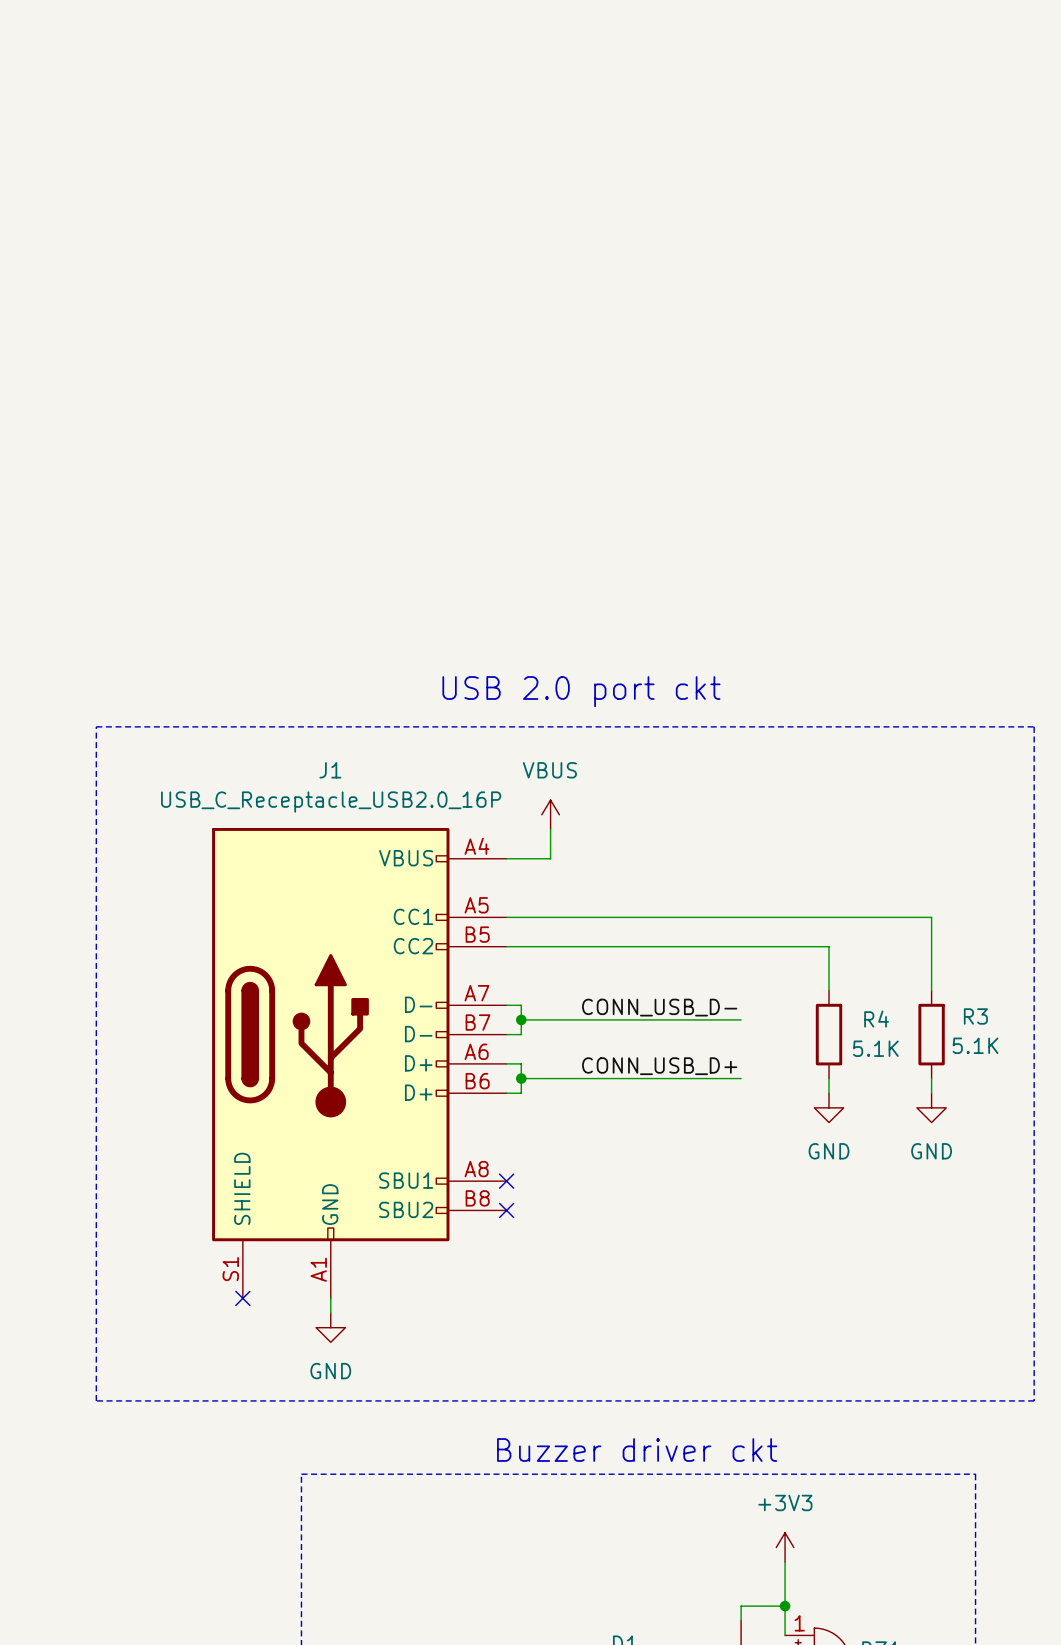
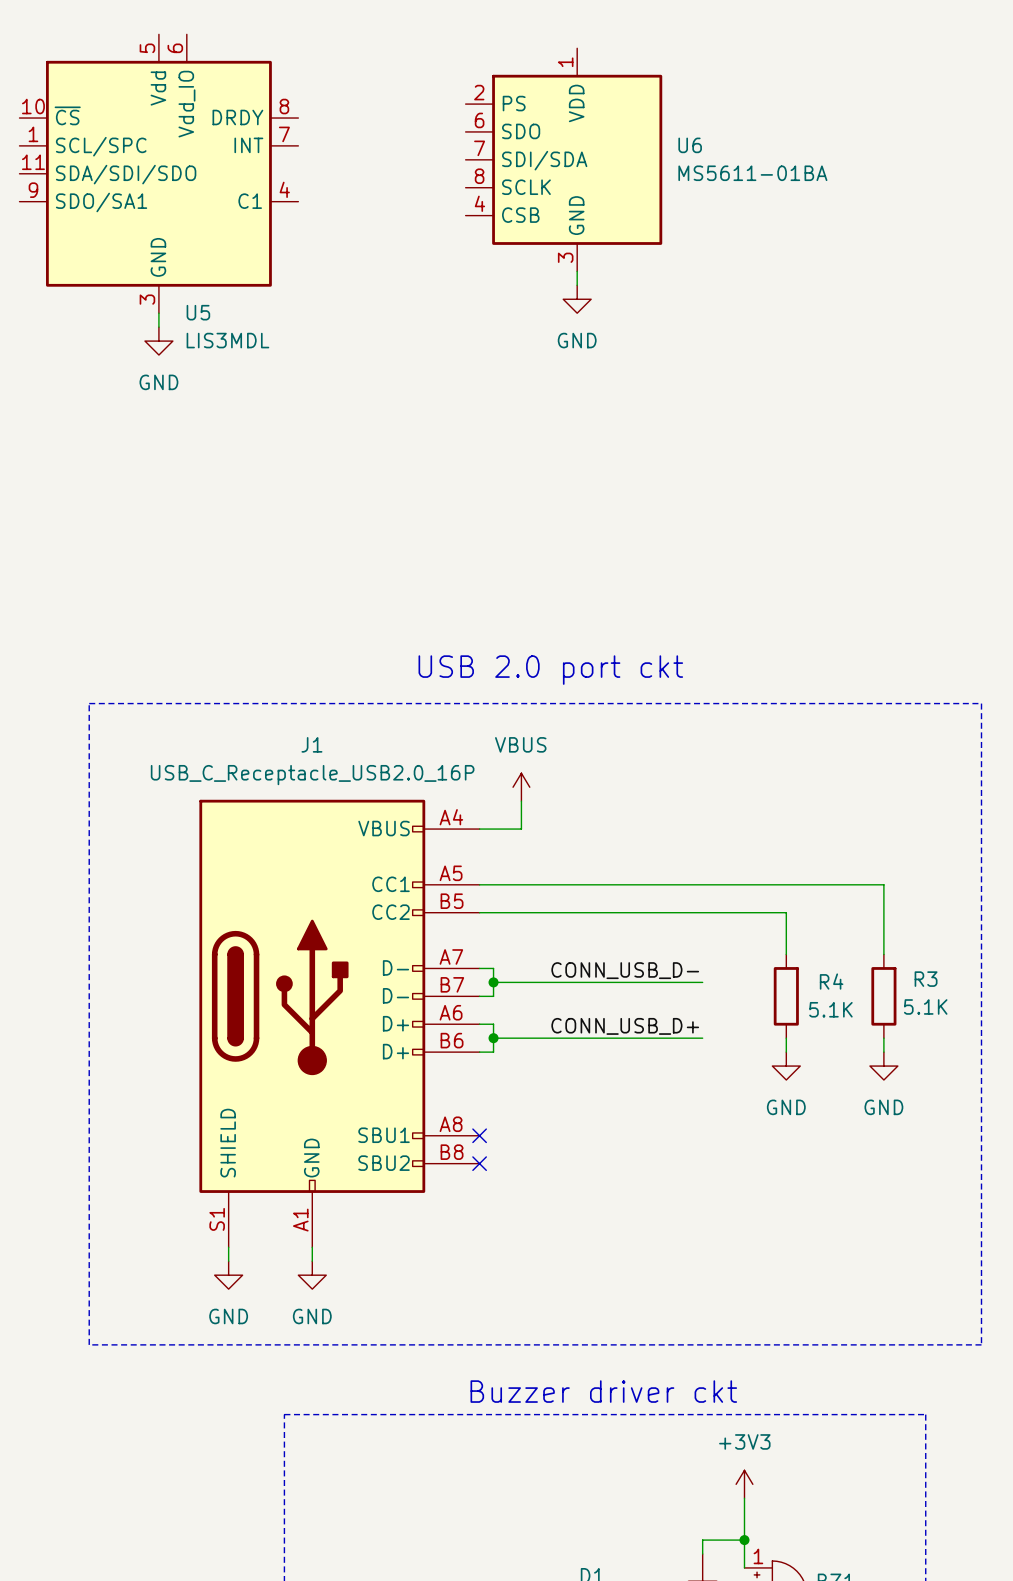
U6: none -> MS5611-01BA (563, 159)
U5: none -> LIS3MDL (158, 173)
wire: none -> (577, 271) (577, 285)
power symbol: none -> GND (577, 299)
wire: none -> (158, 313) (158, 327)
power symbol: none -> GND (158, 341)
wire: none -> (228, 1247) (228, 1261)
no-connect mark: (242, 1298) -> none
power symbol: none -> GND (228, 1275)

